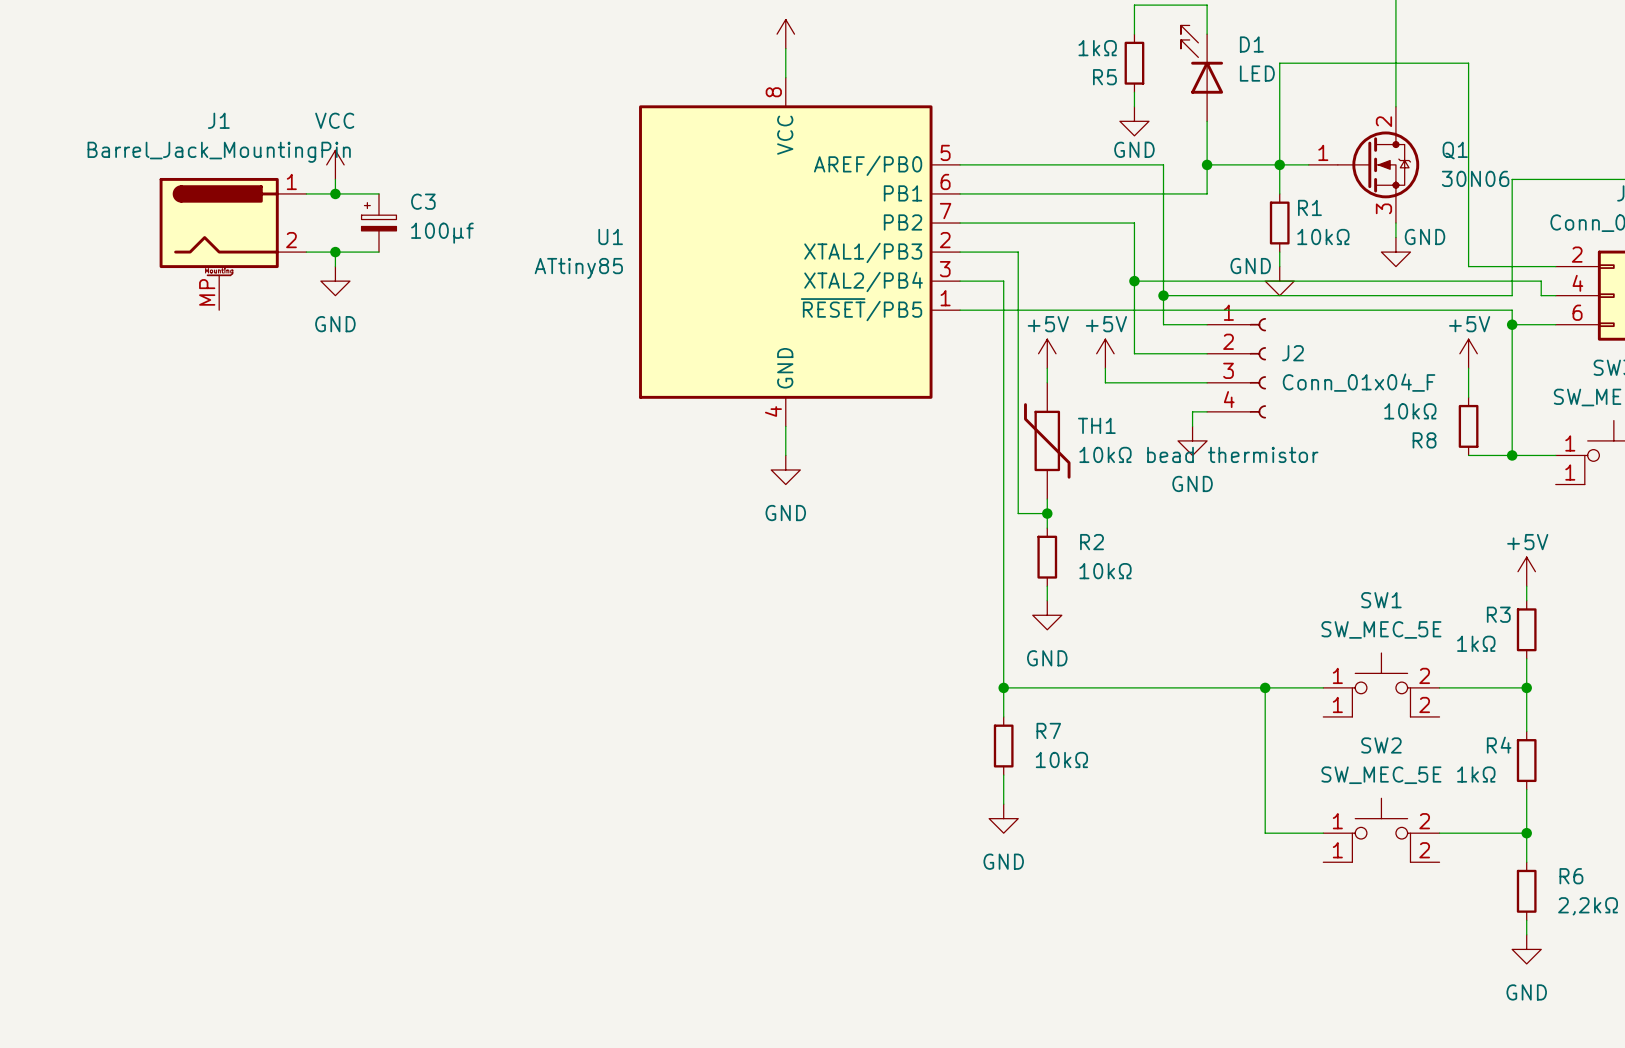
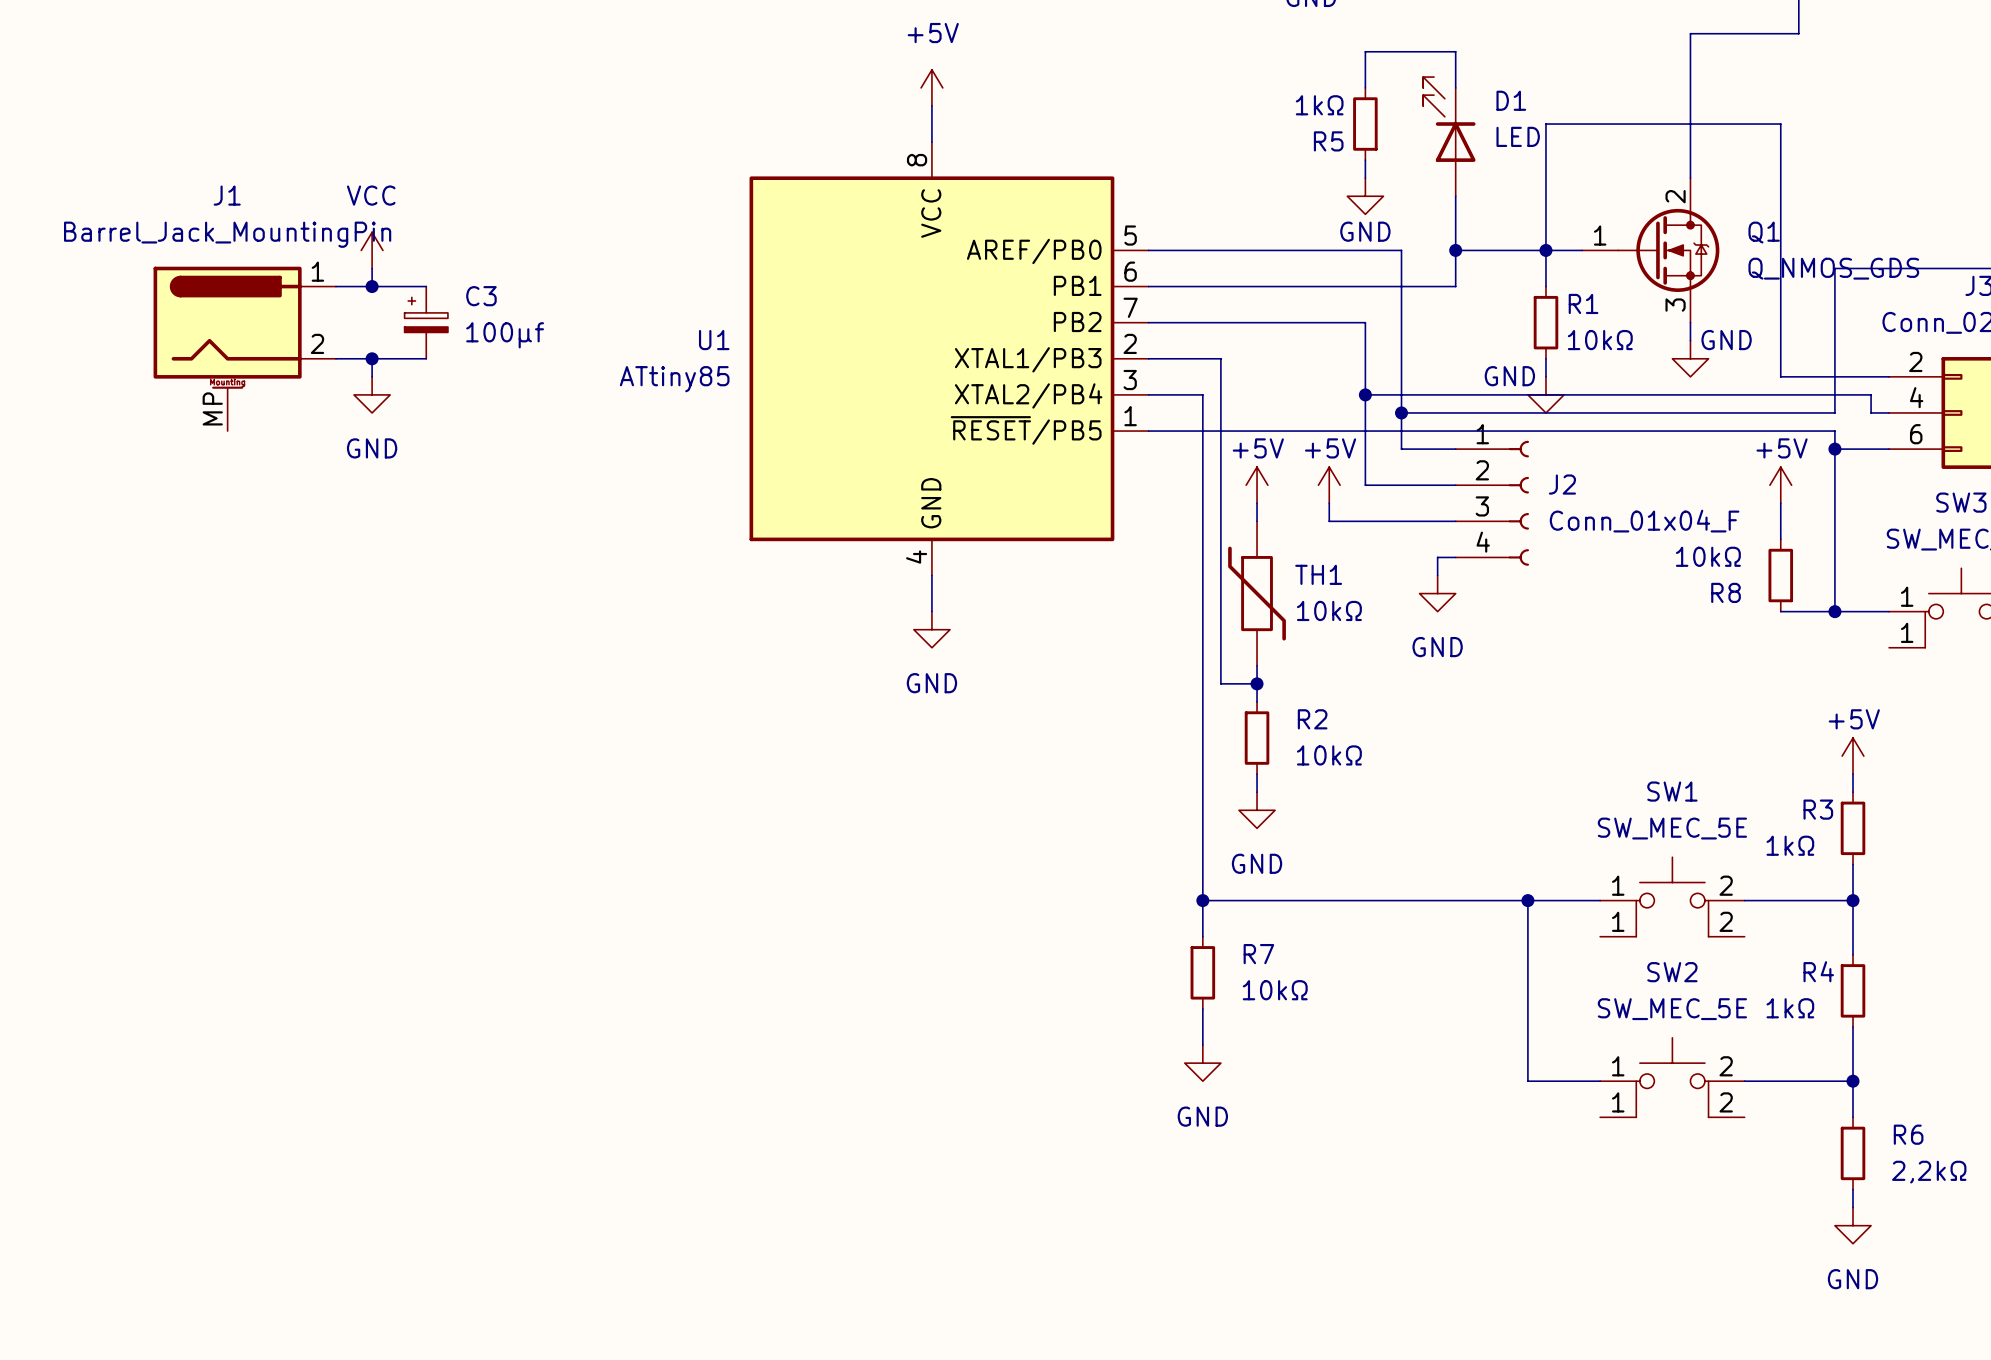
Q1 value: 30N06 (1475, 178) -> Q_NMOS_GDS (1833, 268)
TH1 value: 10kΩ bead thermistor (1198, 454) -> 10kΩ (1329, 610)

